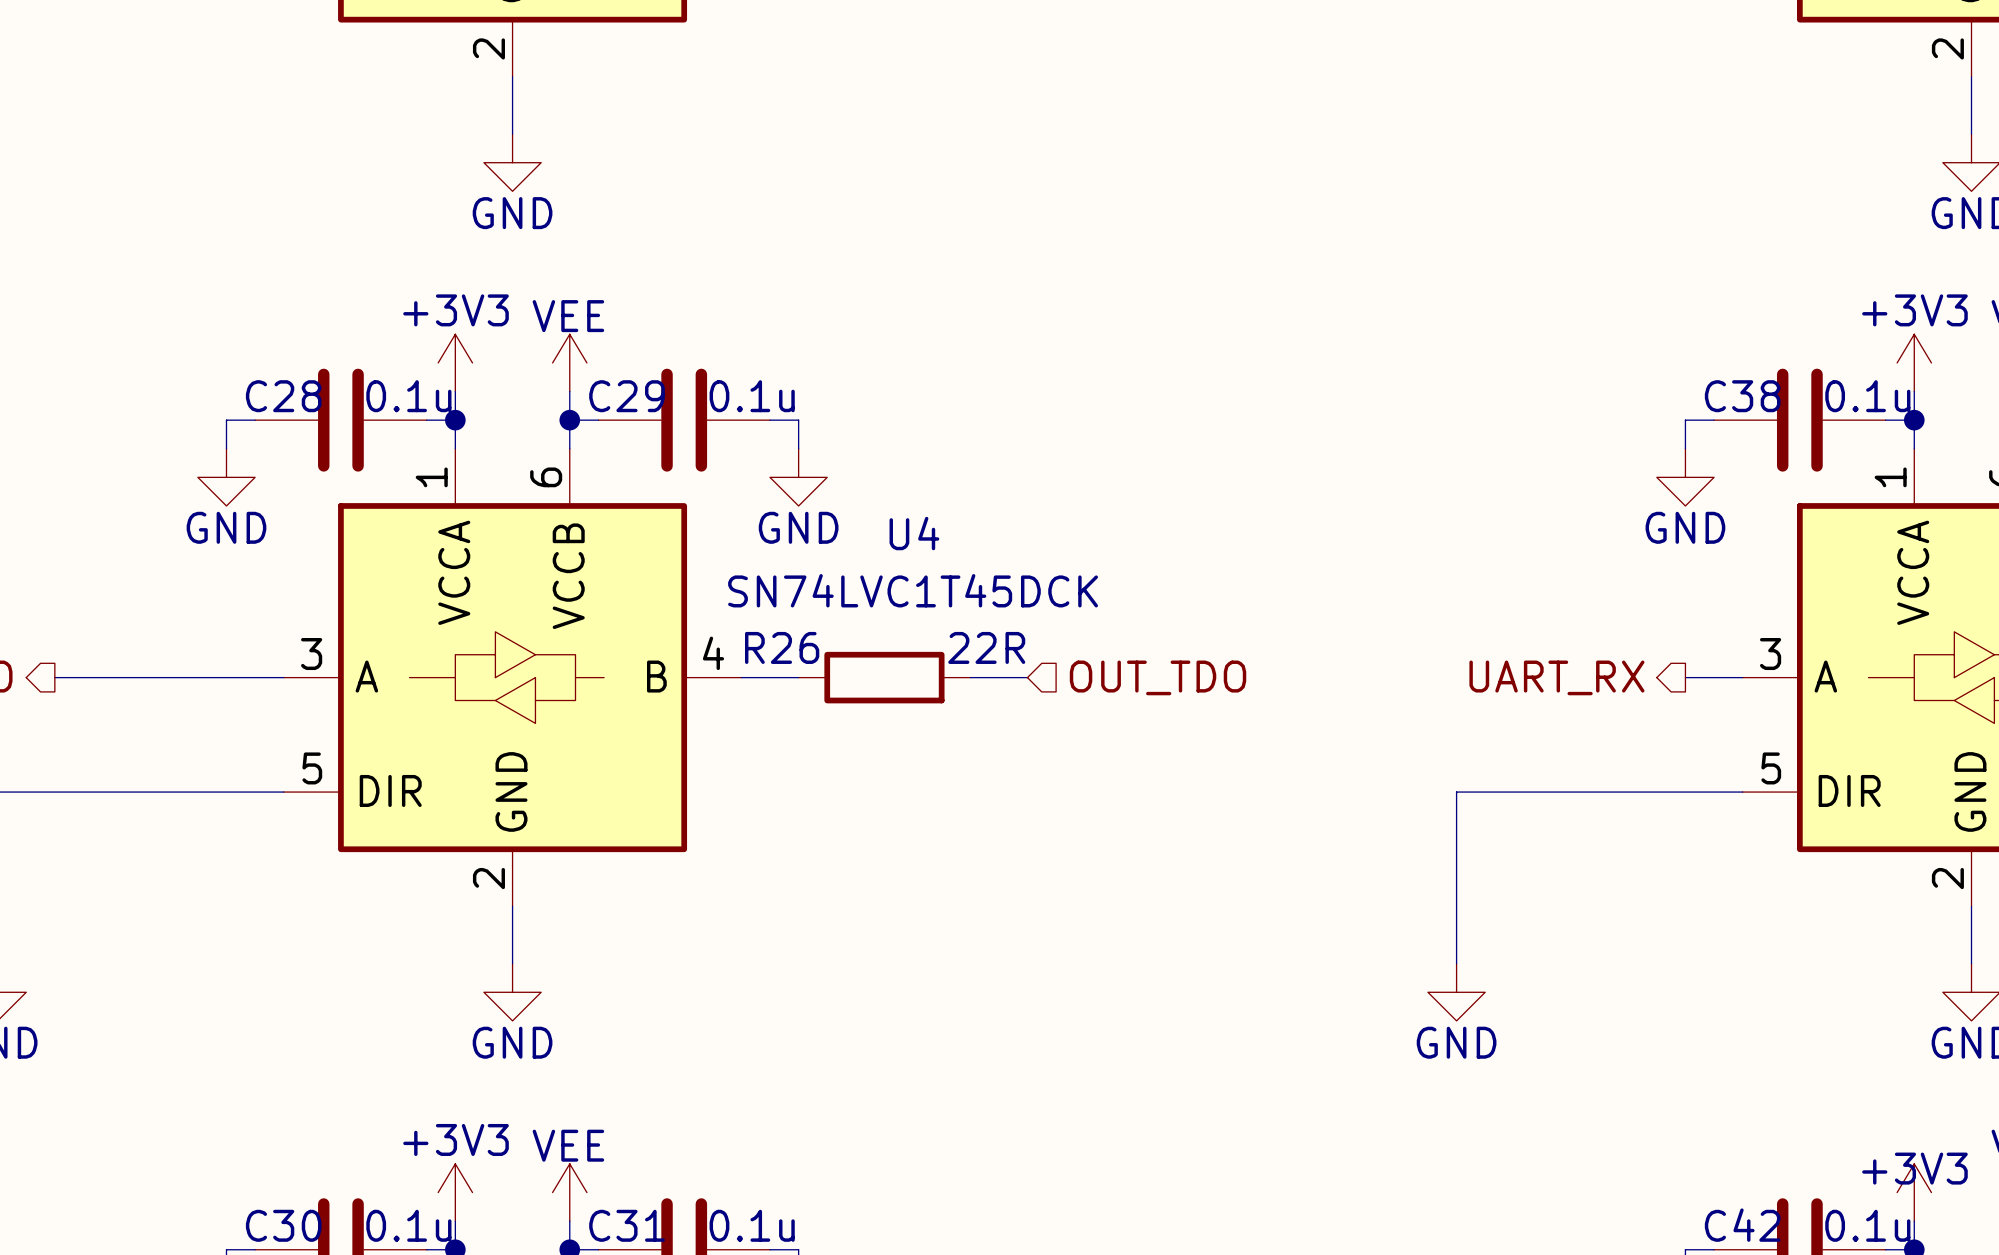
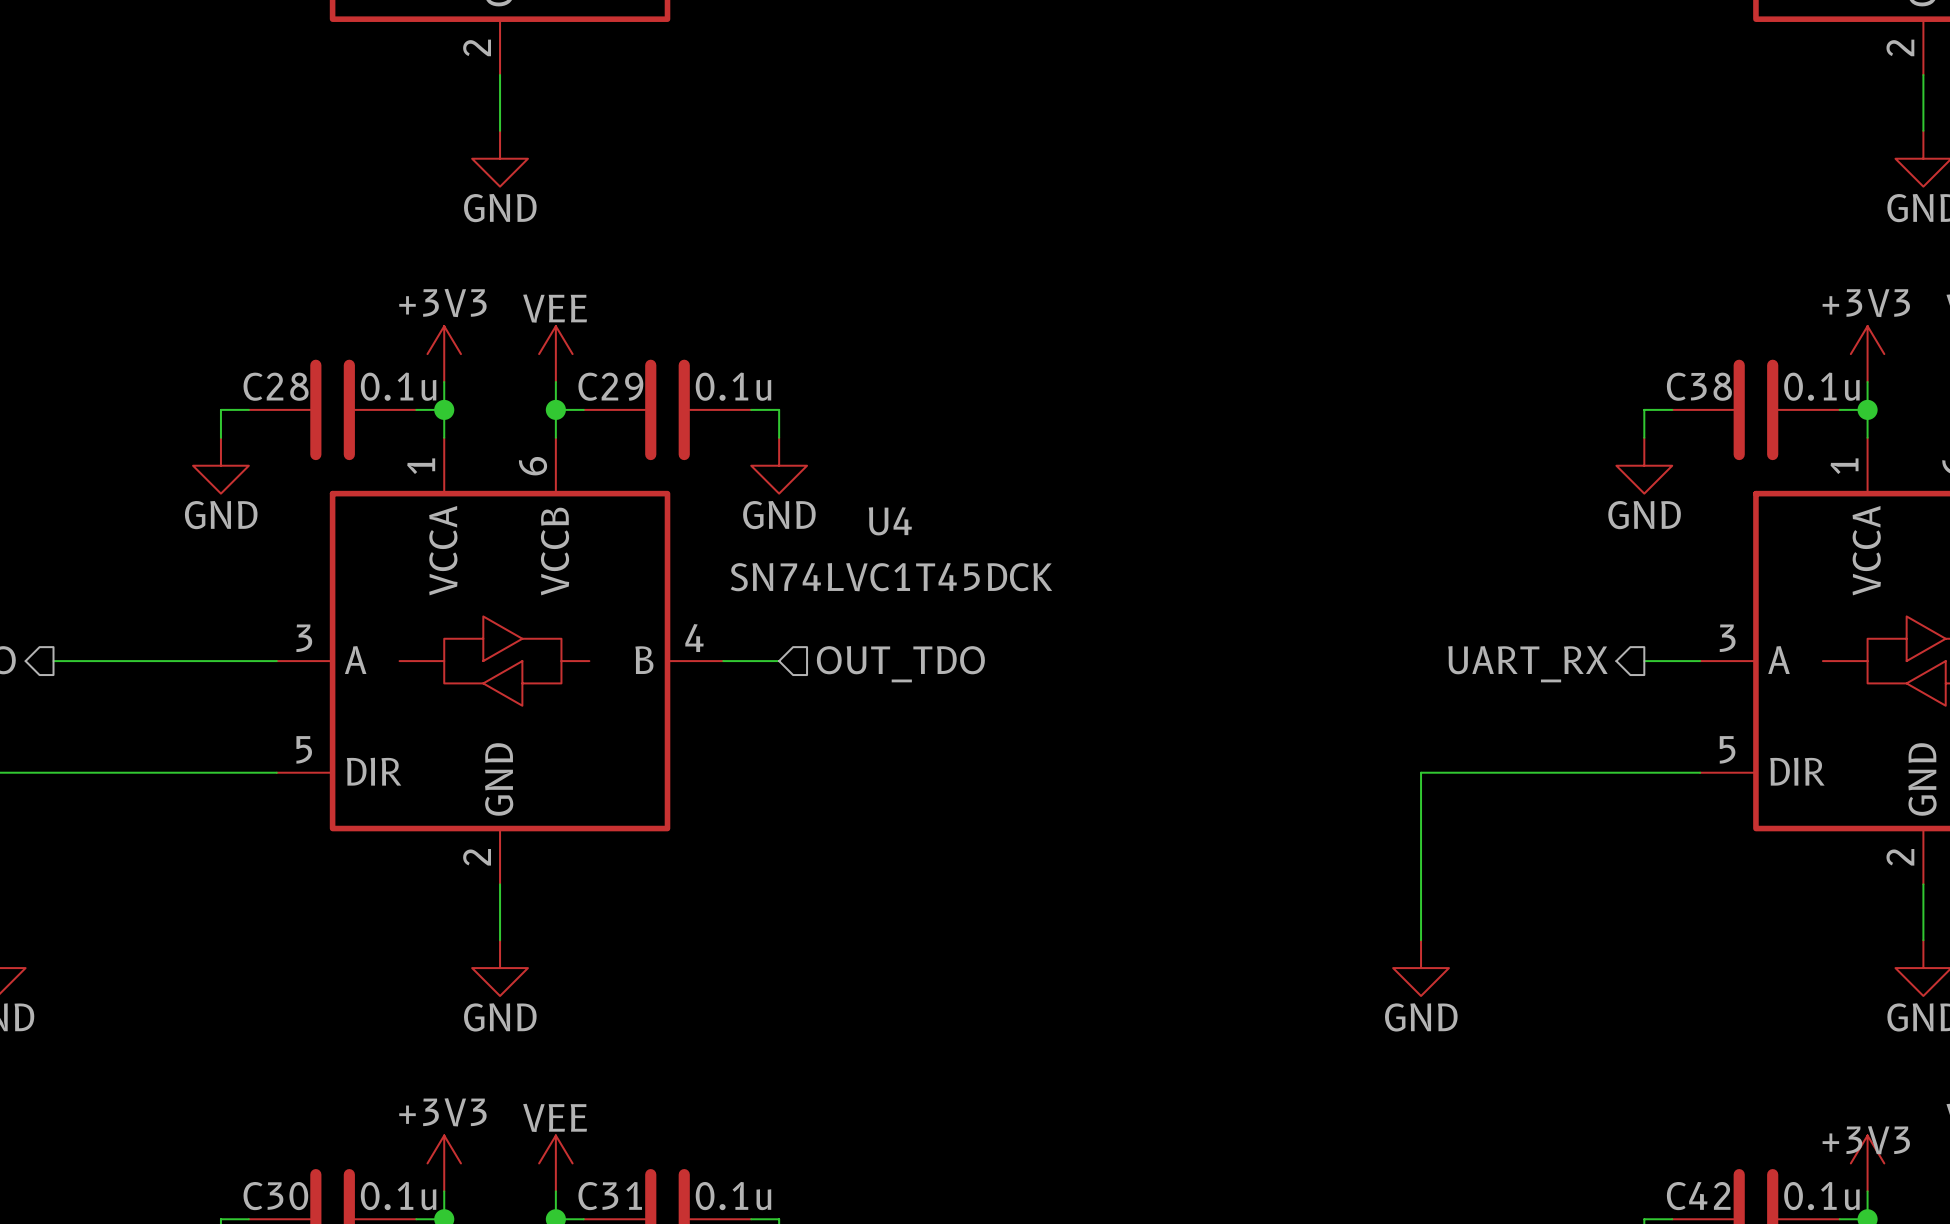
R26: 22R (884, 677) -> none
wire: (970, 677) (1027, 677) -> none
hierarchical label position: OUT_TDO (1158, 677) -> OUT_TDO (900, 664)

